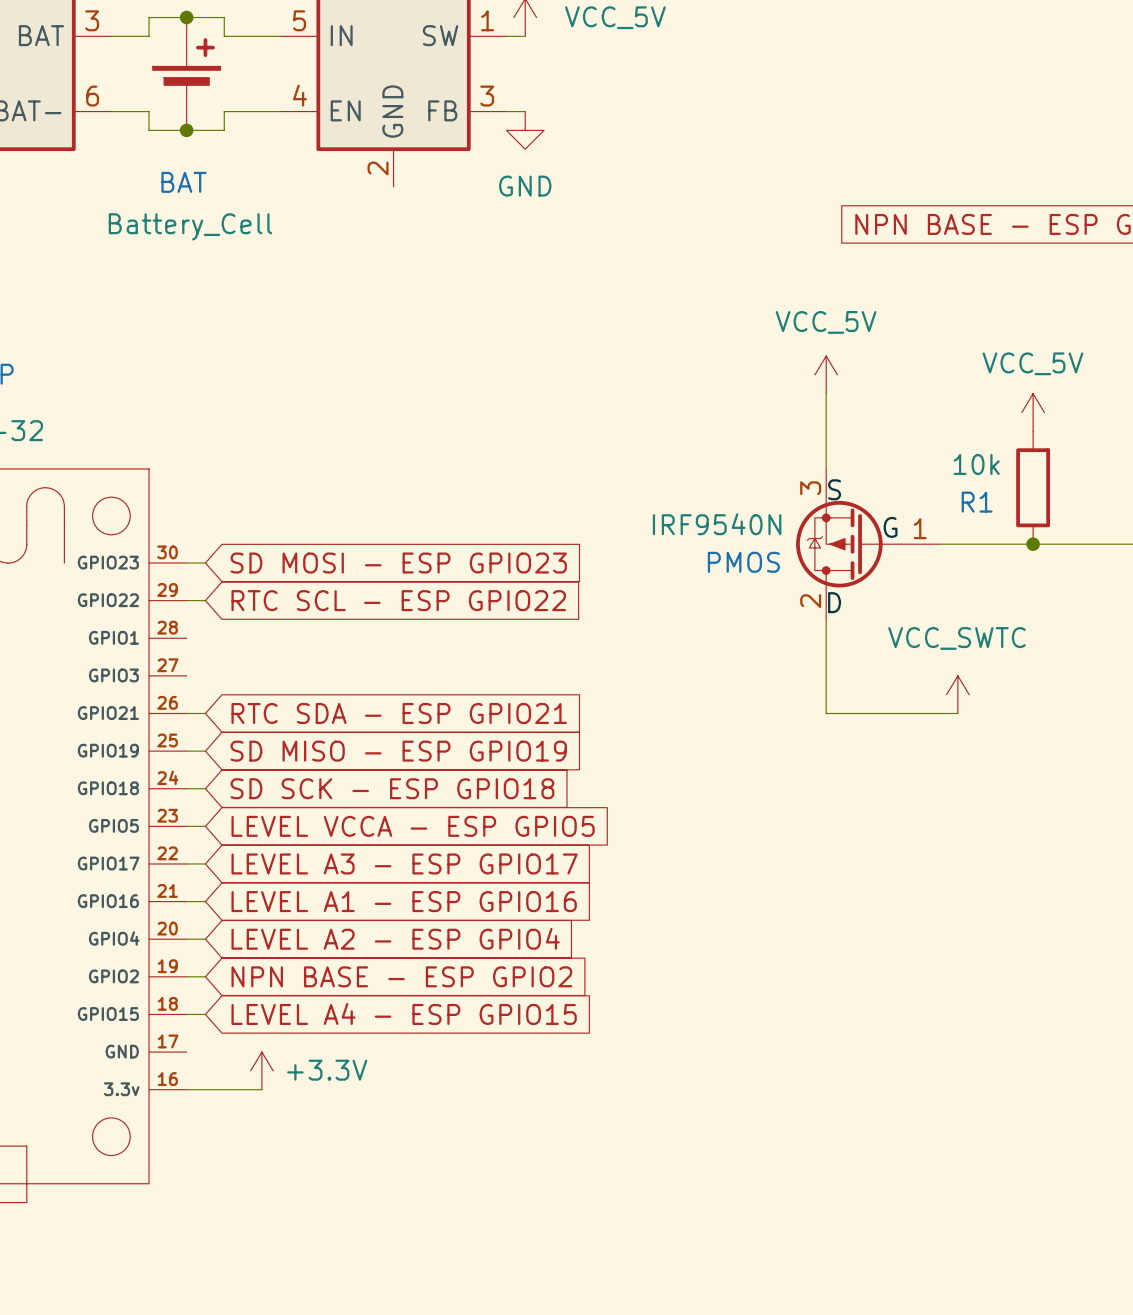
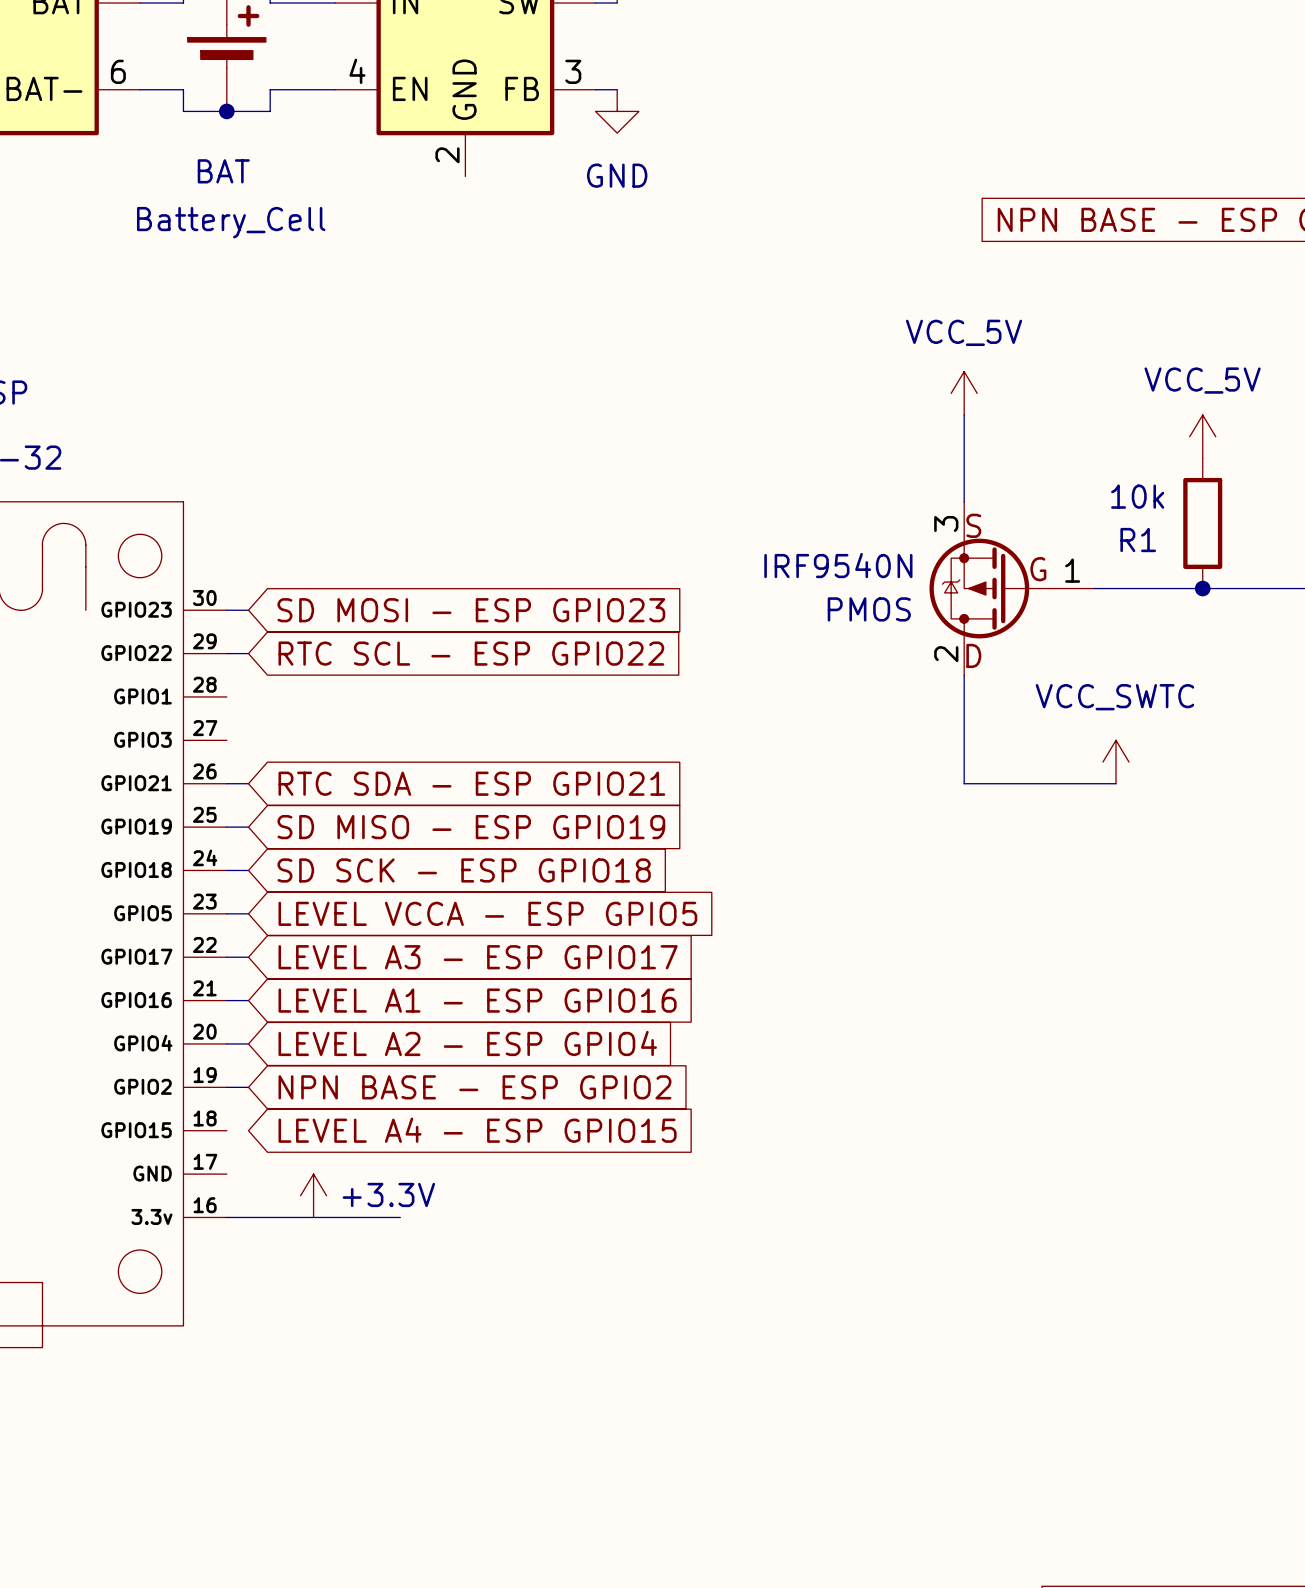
wire: (186, 1014) (205, 1014) -> none
wire: none -> (313, 1217) (400, 1217)

